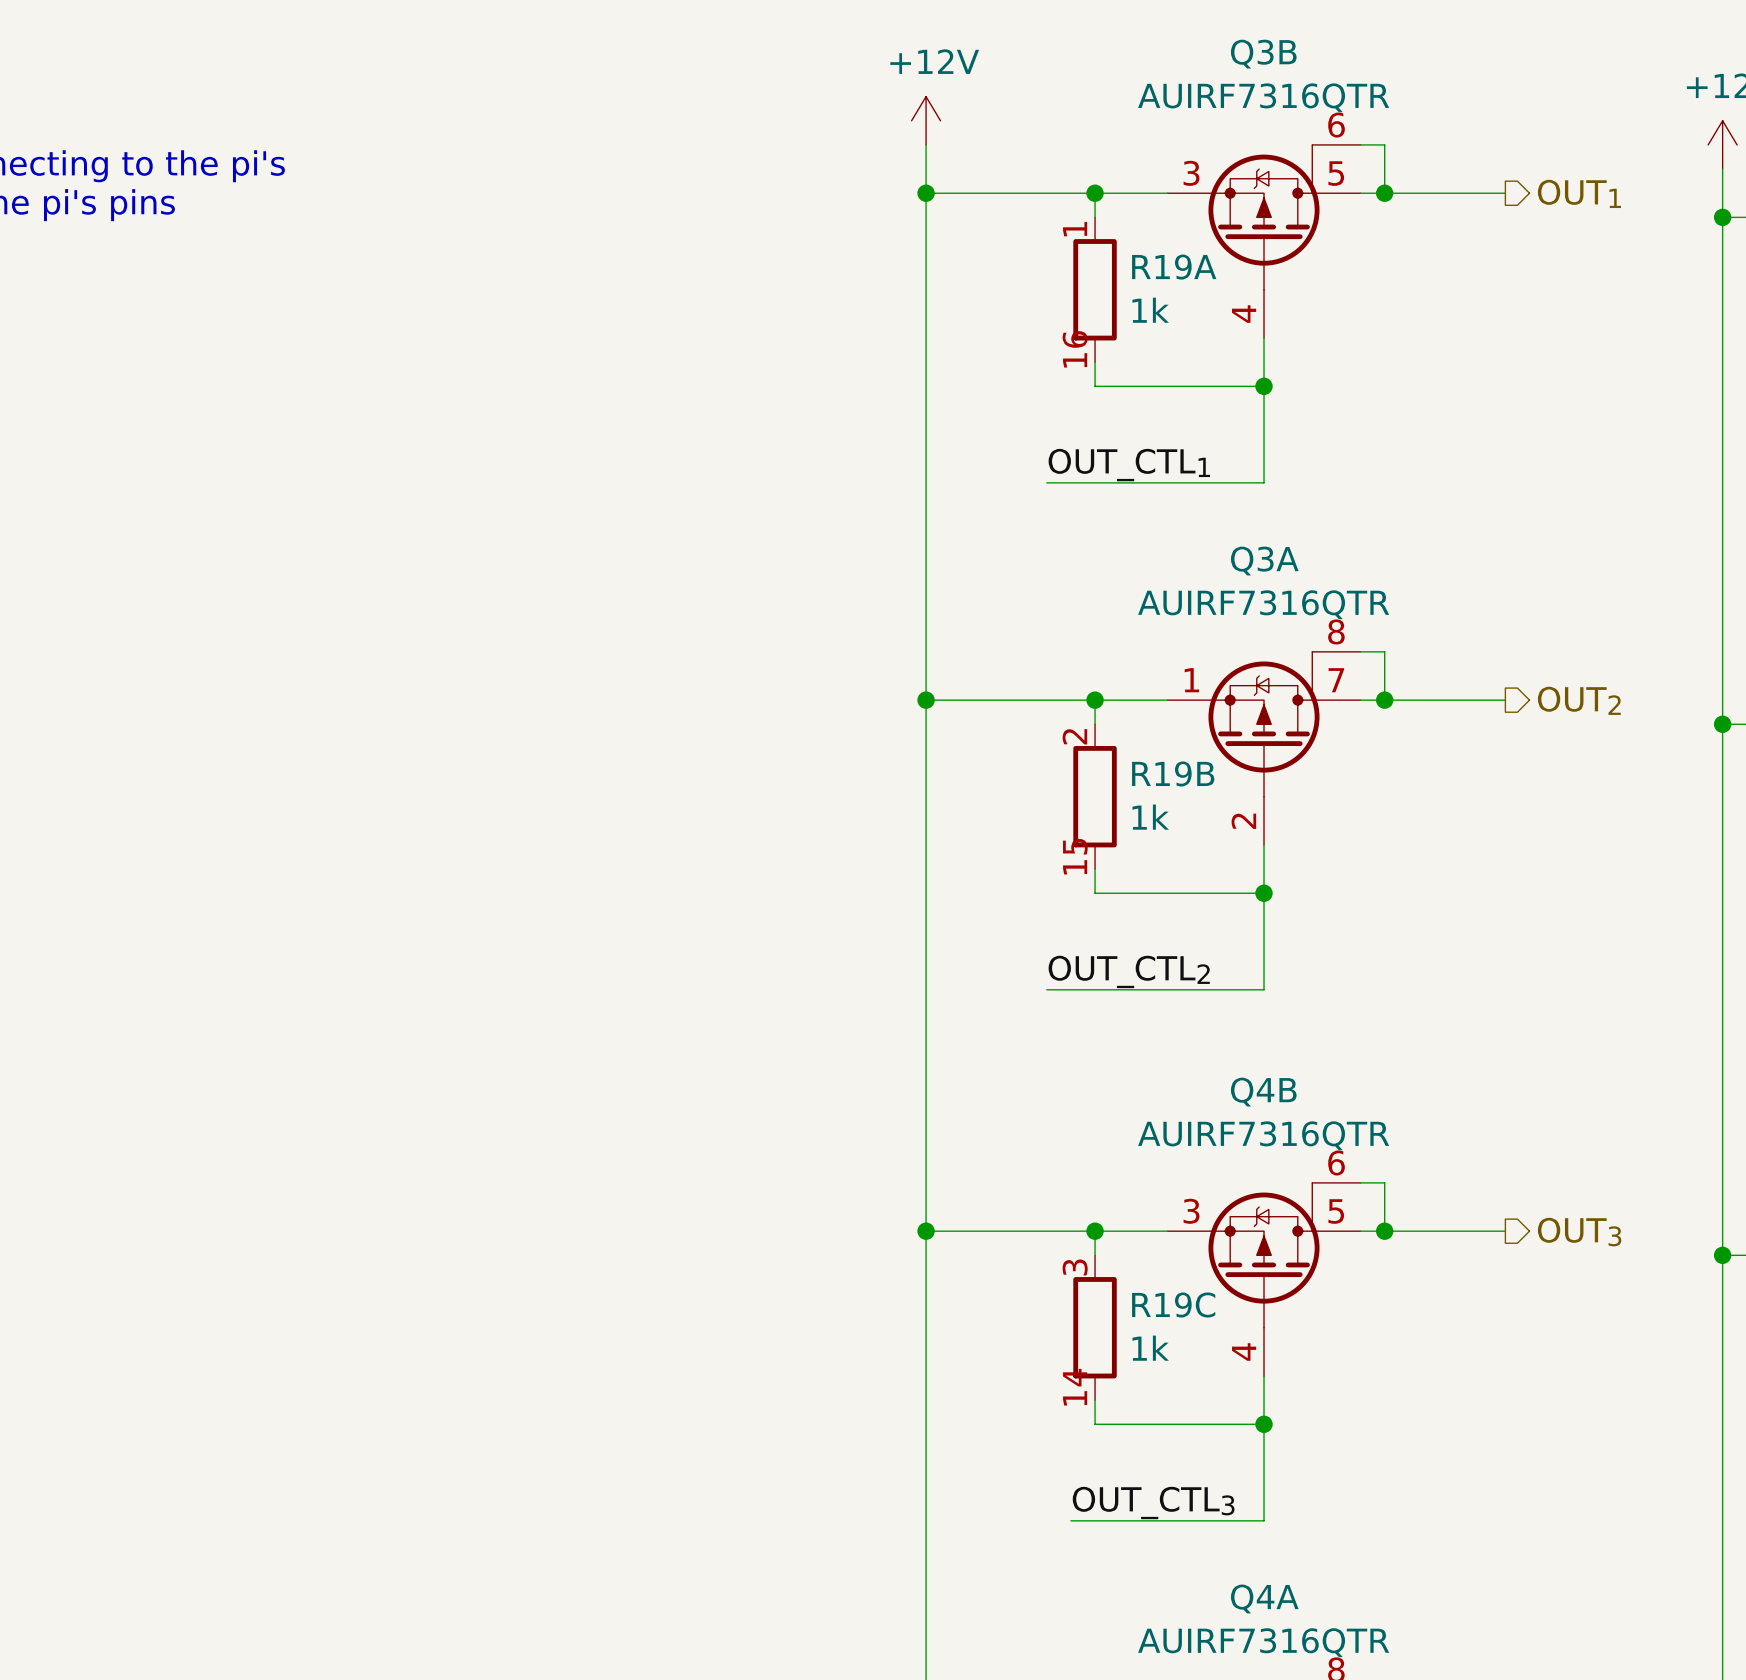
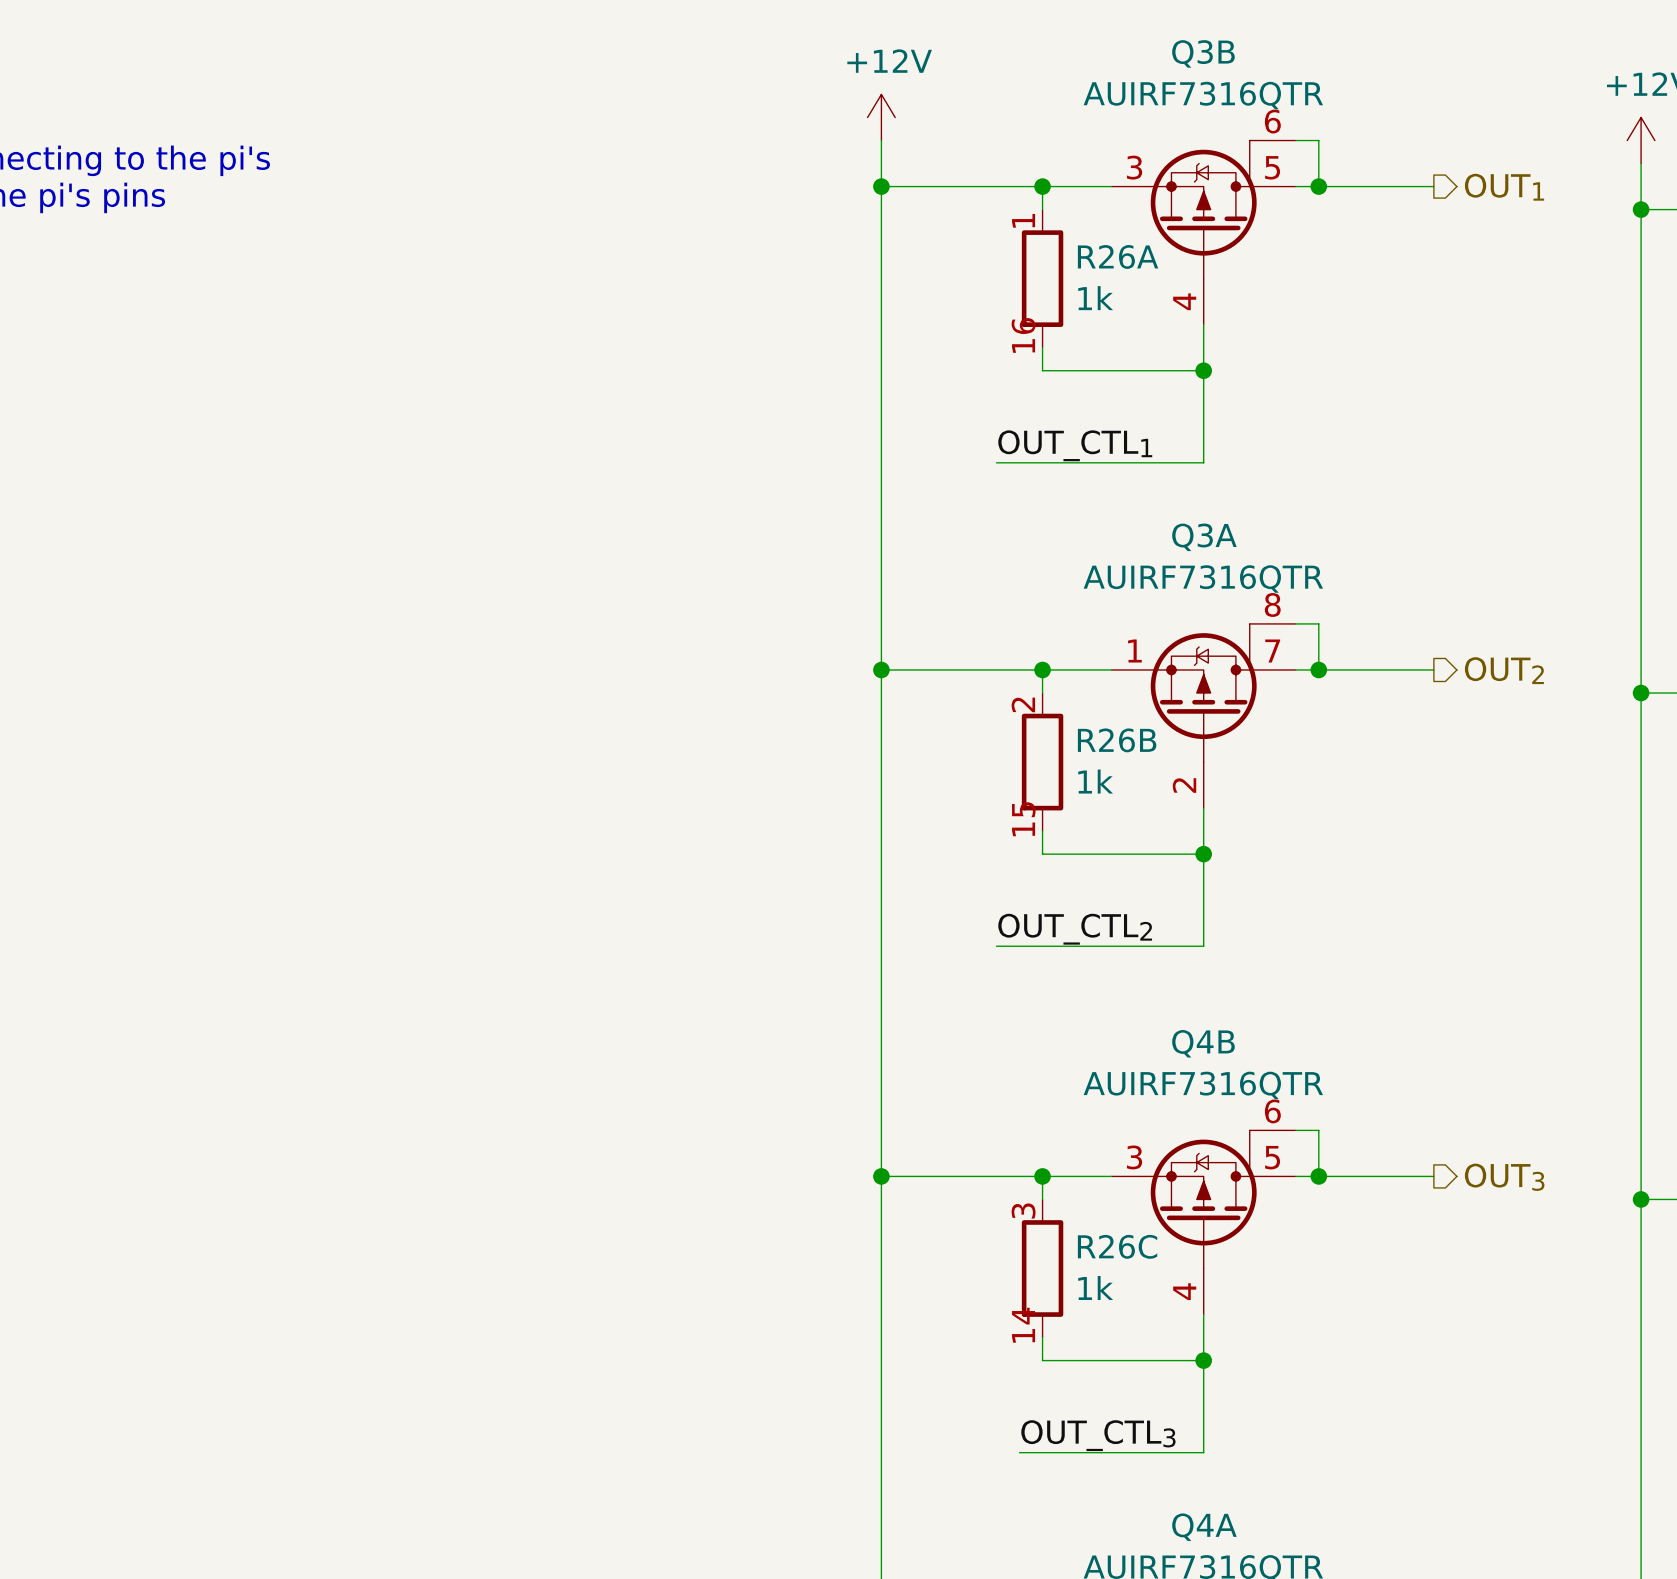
R19A name: R19A (1174, 267) -> R26A (1118, 256)
R19B name: R19B (1173, 773) -> R26B (1117, 740)
R19C name: R19C (1173, 1305) -> R26C (1117, 1246)

